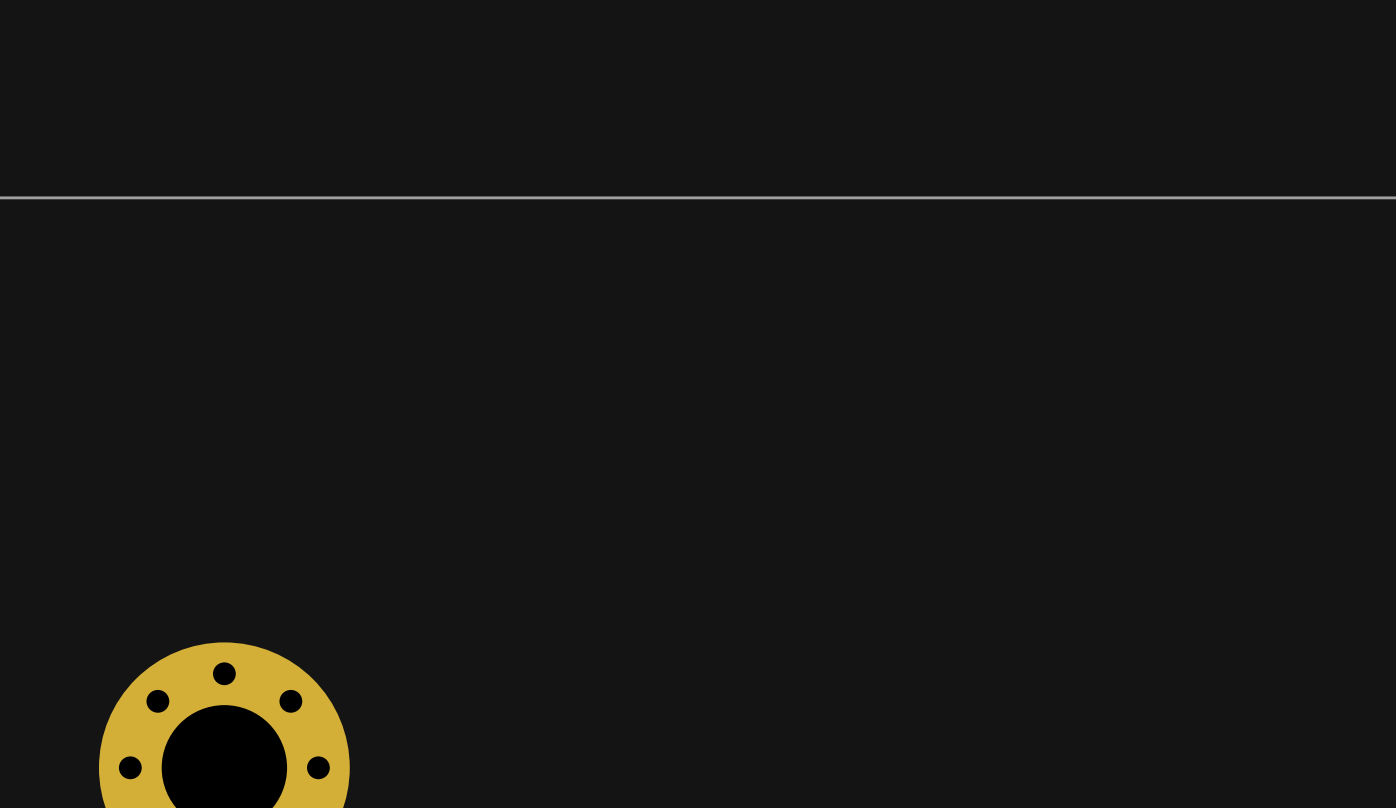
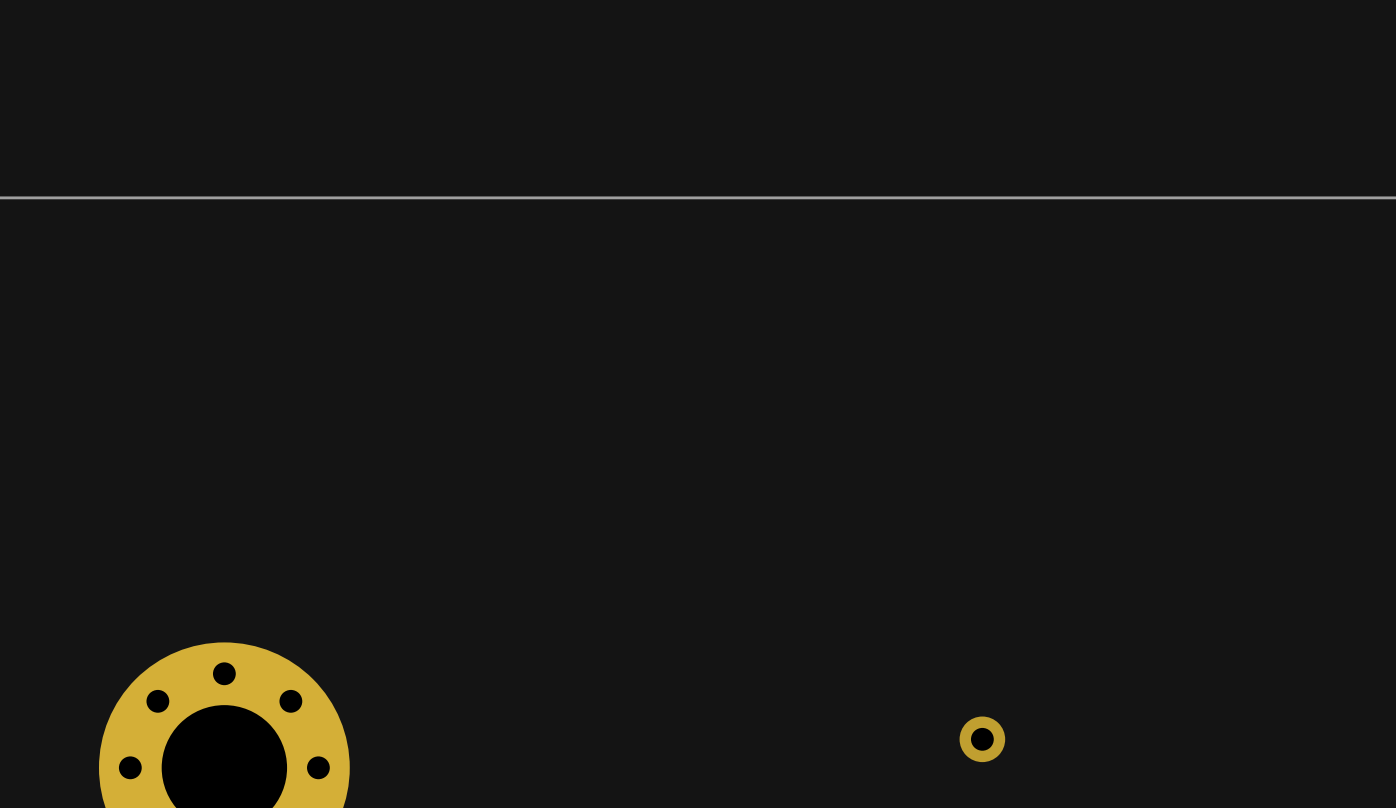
via: none -> (982, 739)

